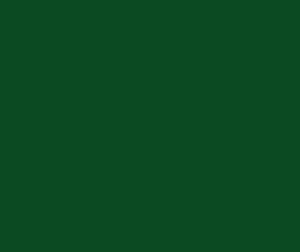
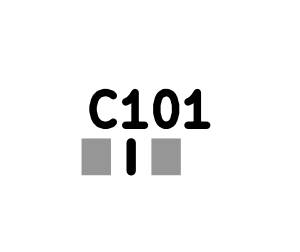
C101: none -> (131, 156)

